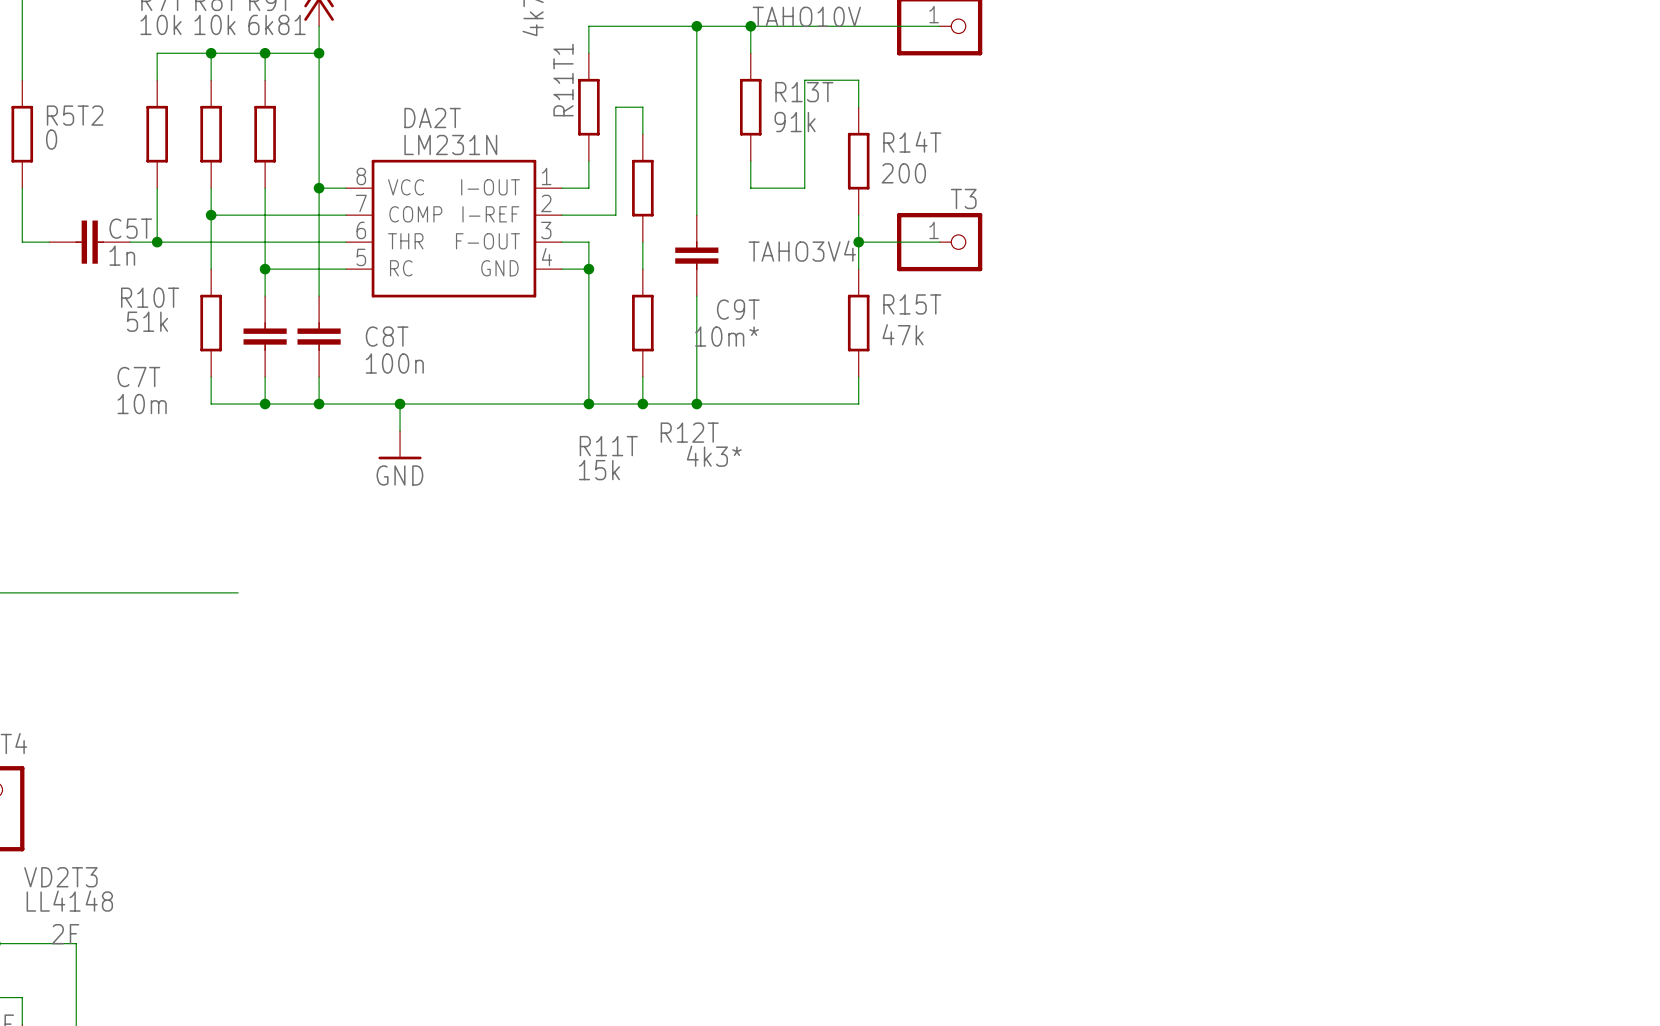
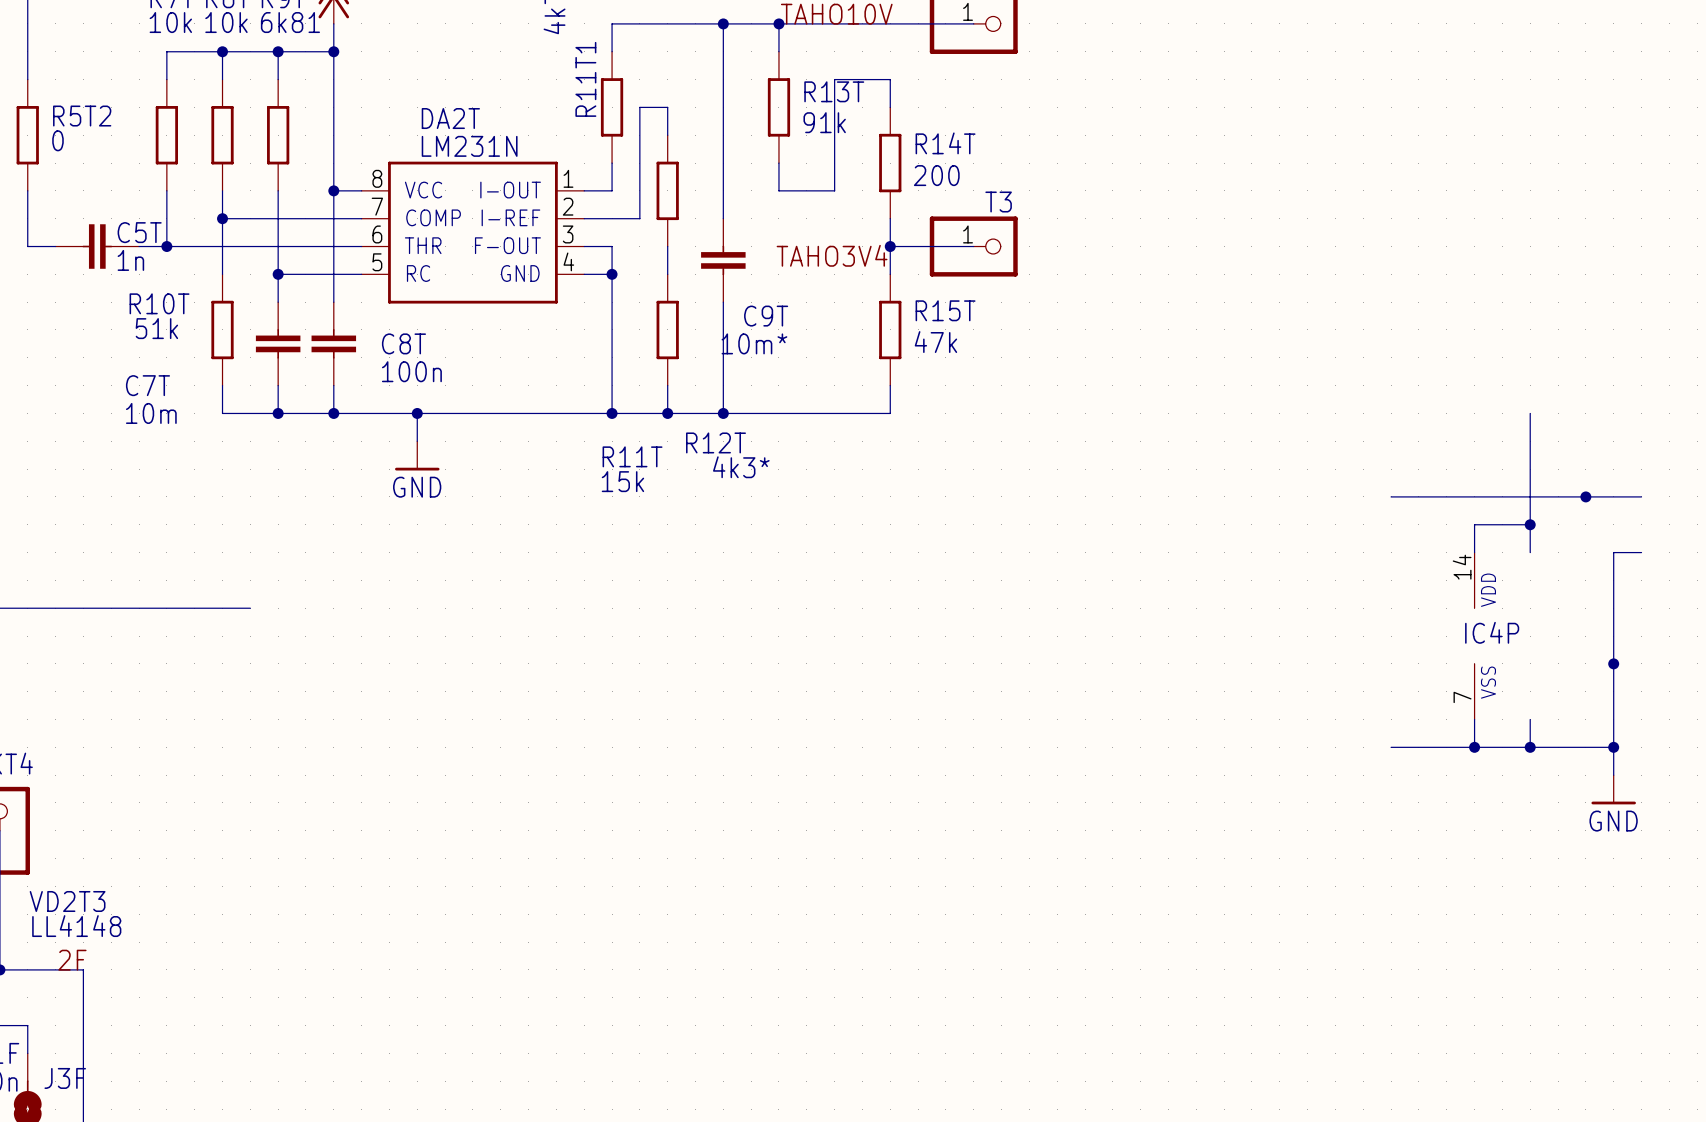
wire: none -> (1530, 413) (1530, 552)
wire: none -> (1391, 496) (1641, 496)
junction: none -> (1585, 496)
wire: none -> (1530, 524) (1474, 524) (1474, 552)
junction: none -> (1530, 524)
wire: none -> (1641, 552) (1613, 552) (1613, 775)
IC4P: none -> (1474, 636)
junction: none -> (1613, 663)
wire: none -> (1474, 719) (1474, 747)
wire: none -> (1530, 719) (1530, 747)
wire: none -> (1391, 747) (1613, 747)
junction: none -> (1474, 747)
junction: none -> (1530, 747)
junction: none -> (1613, 747)
power symbol: none -> GND (1613, 789)

